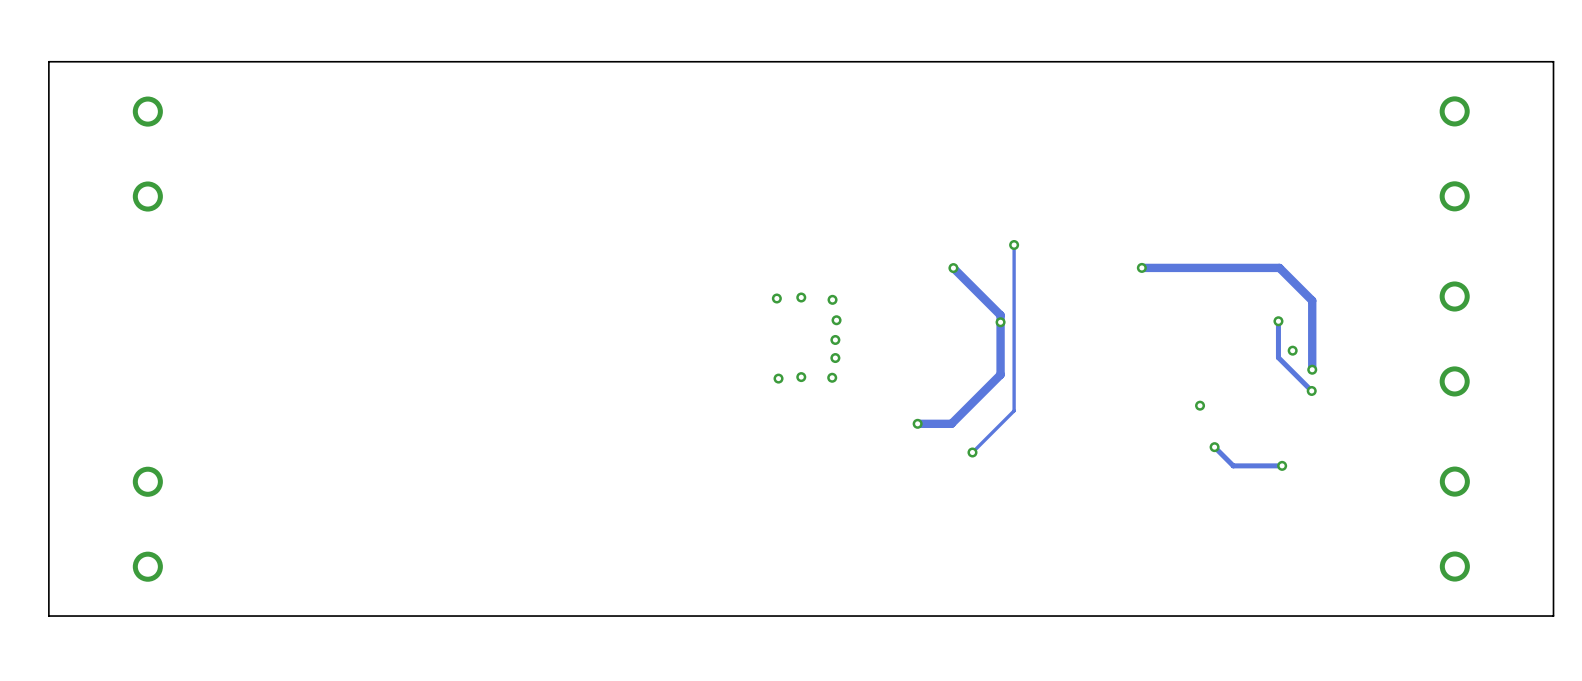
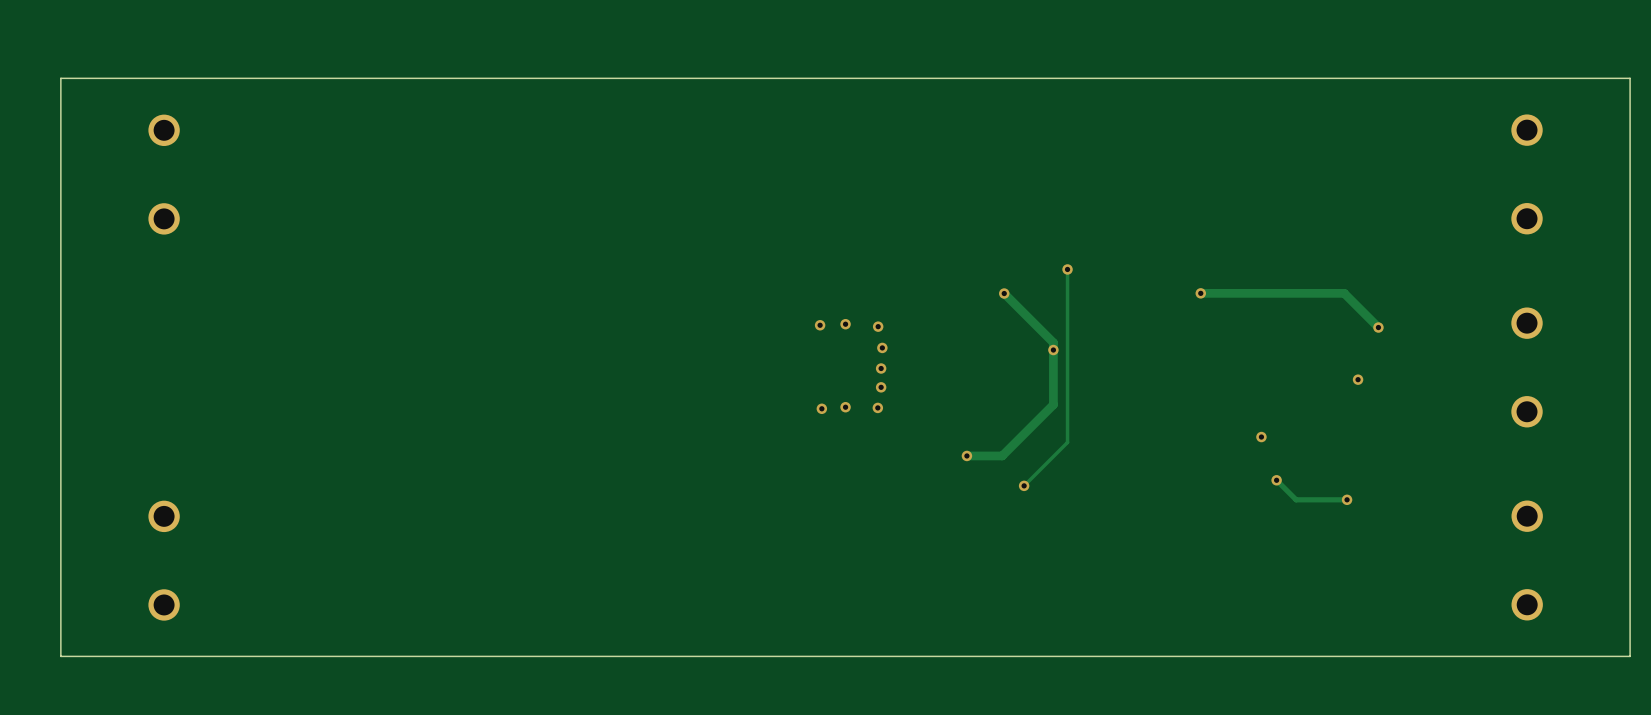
track: (1312, 300) (1312, 369) -> none
via: none -> (1378, 327)
track: (1278, 321) (1278, 357) (1311, 390) -> none
via: (1278, 321) -> none
via: (1312, 369) -> none
via: (1311, 390) -> none

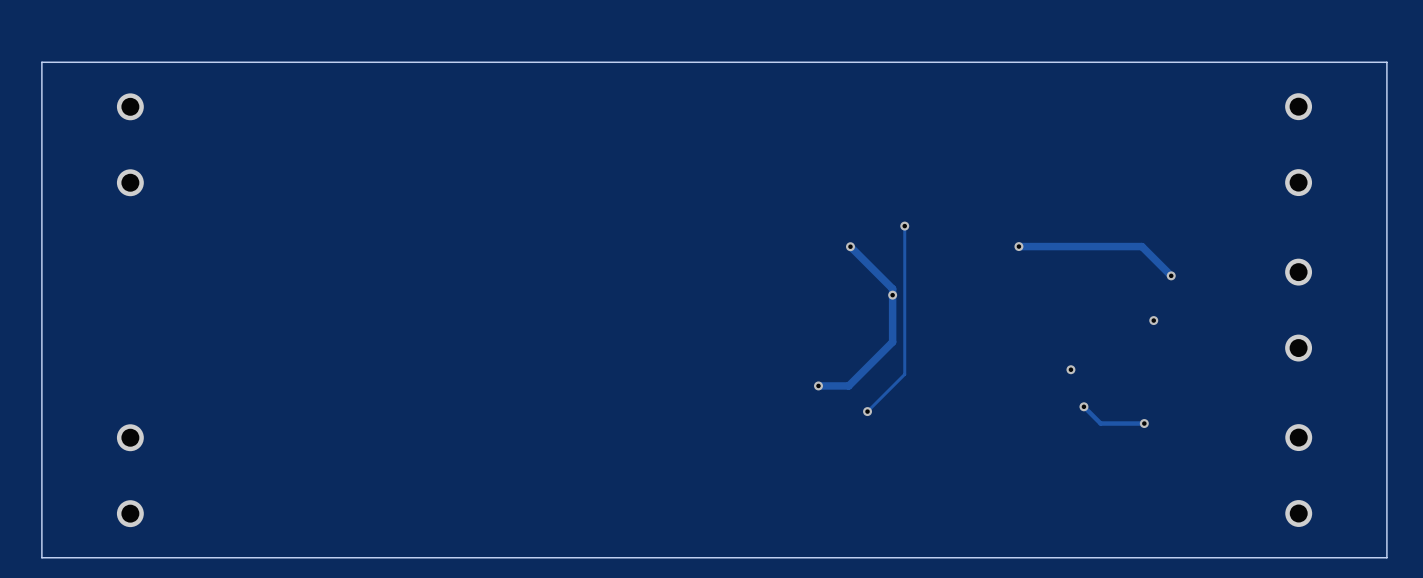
via: (845, 324) -> none
via: (820, 325) -> none
via: (878, 326) -> none
via: (882, 347) -> none
via: (881, 368) -> none
via: (881, 387) -> none
via: (845, 407) -> none
via: (877, 407) -> none
via: (821, 408) -> none

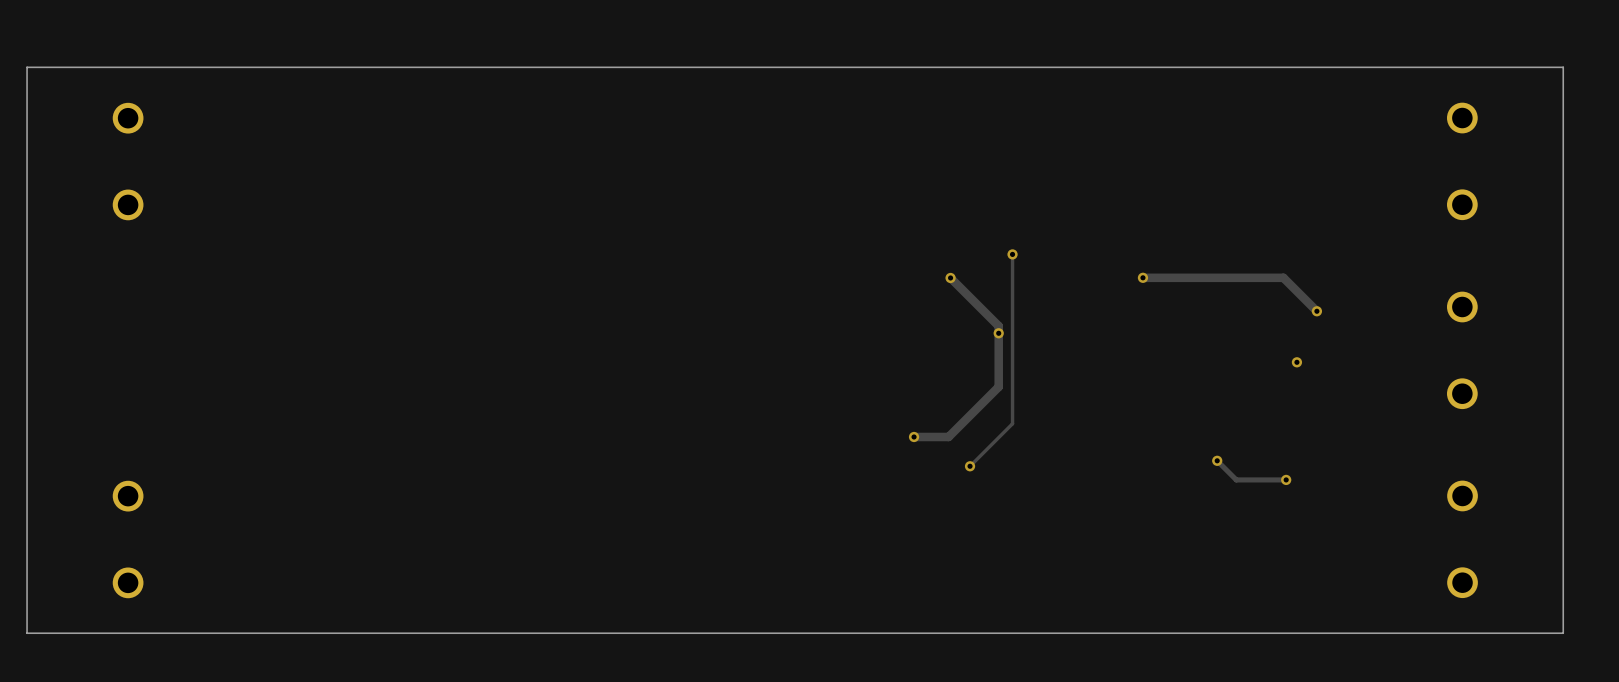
via: (1070, 369) -> none

